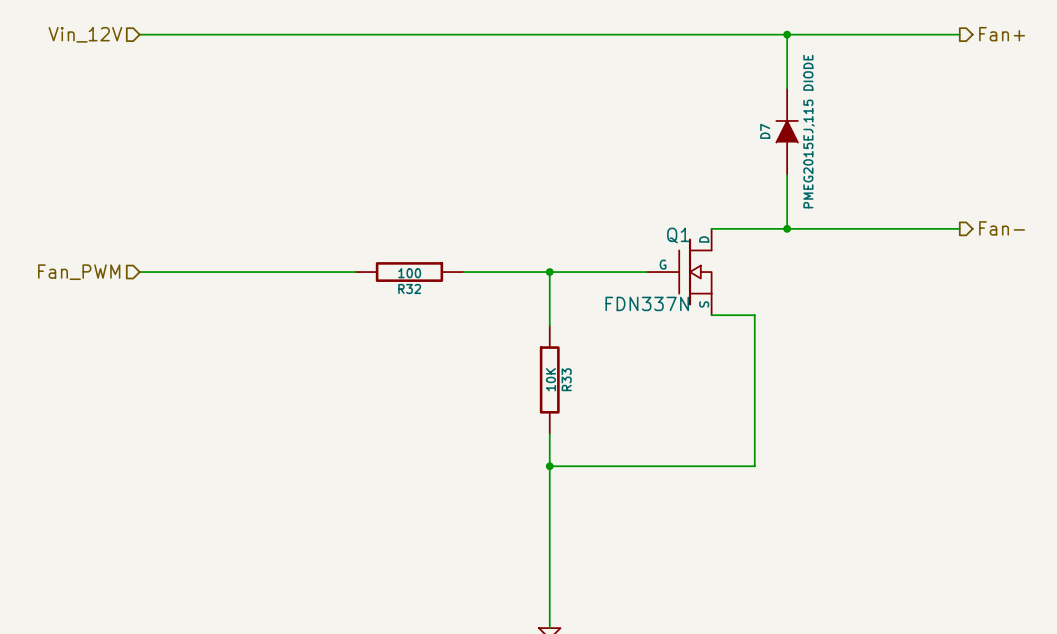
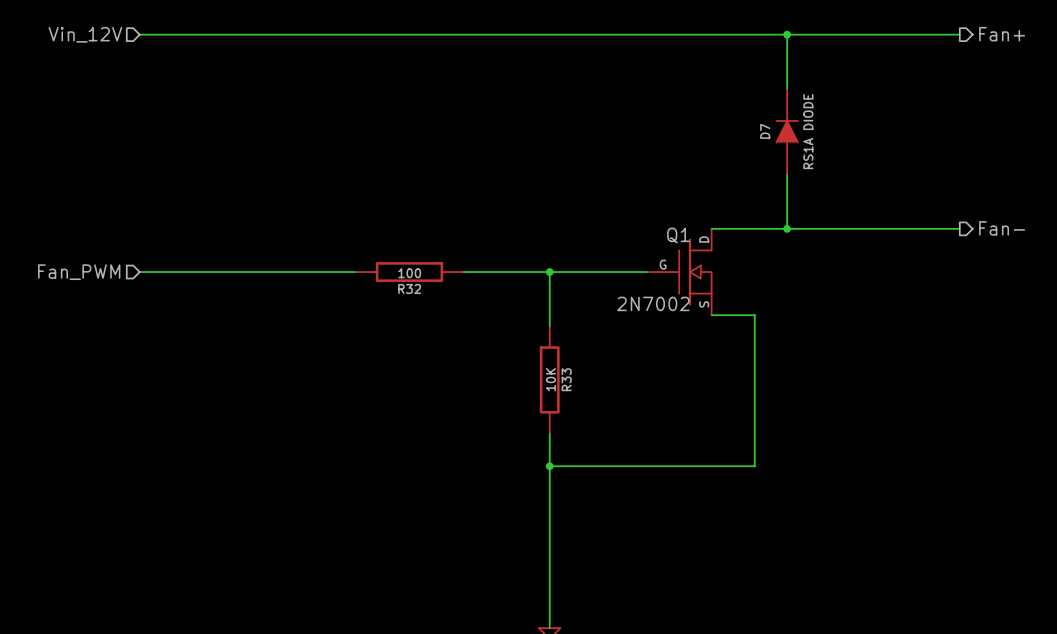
D7 value: PMEG2015EJ,115 DIODE (809, 131) -> RS1A DIODE (808, 131)
Q1 value: FDN337N (647, 303) -> 2N7002 (653, 303)

